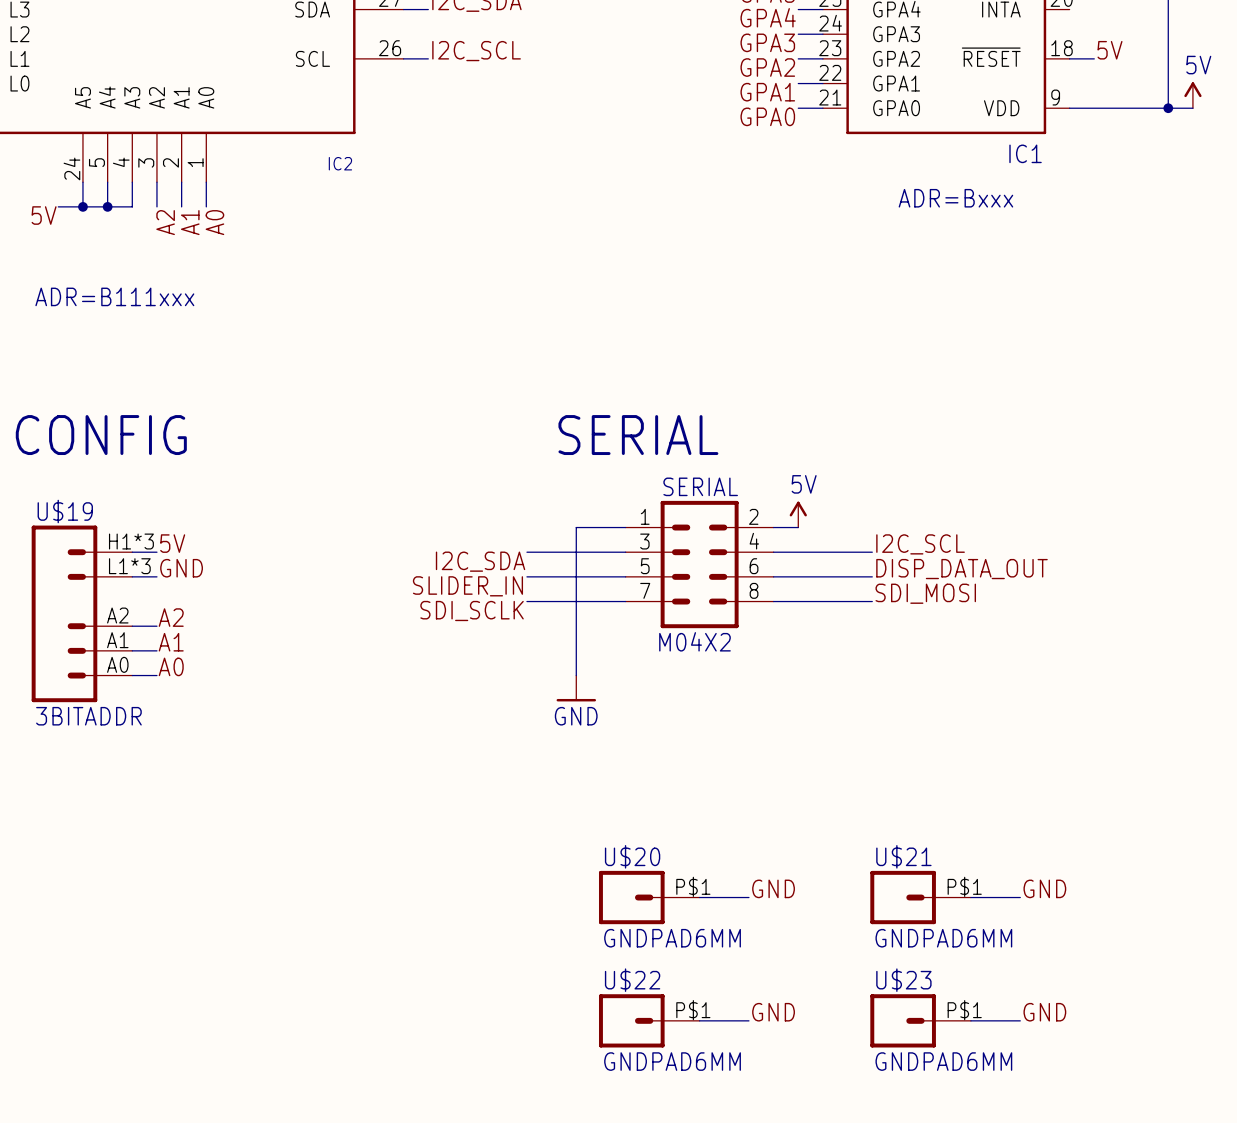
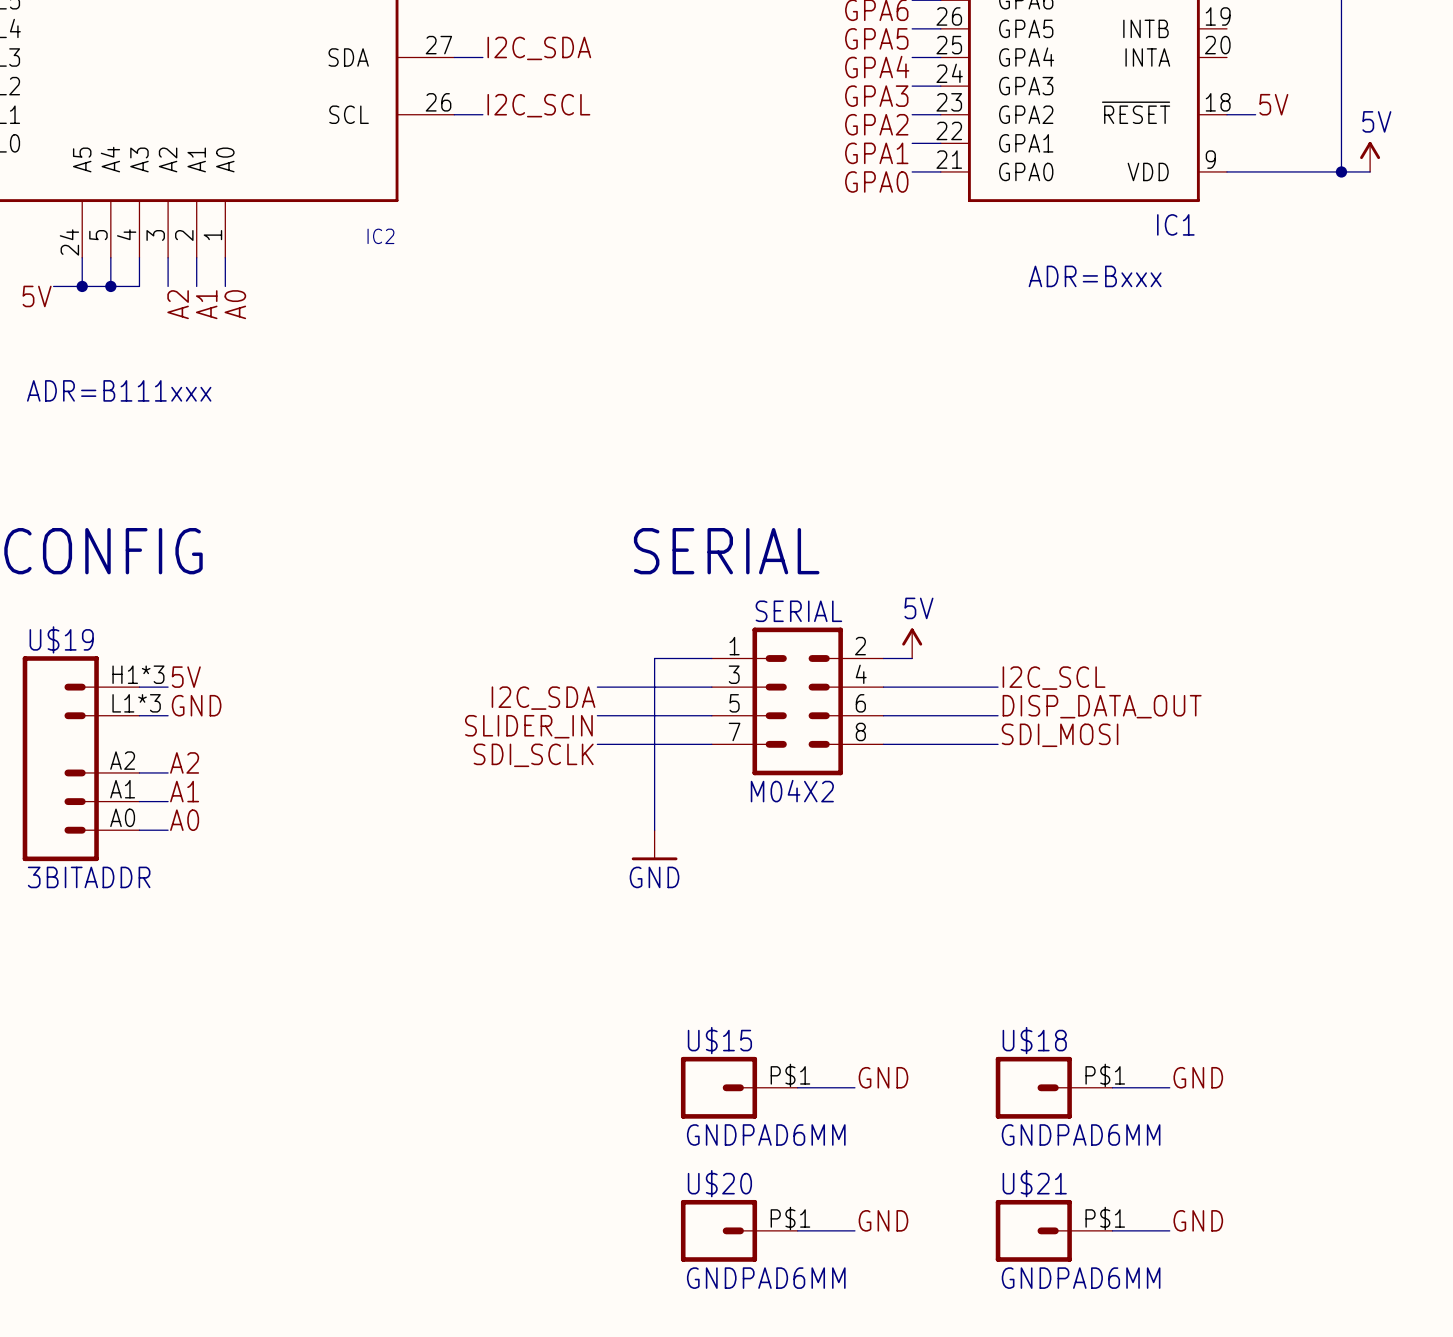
U$20 name: U$20 (632, 856) -> U$15 (719, 1040)
U$21 name: U$21 (903, 856) -> U$18 (1034, 1040)
U$22 name: U$22 (632, 980) -> U$20 (719, 1183)
U$23 name: U$23 (903, 980) -> U$21 (1034, 1183)

